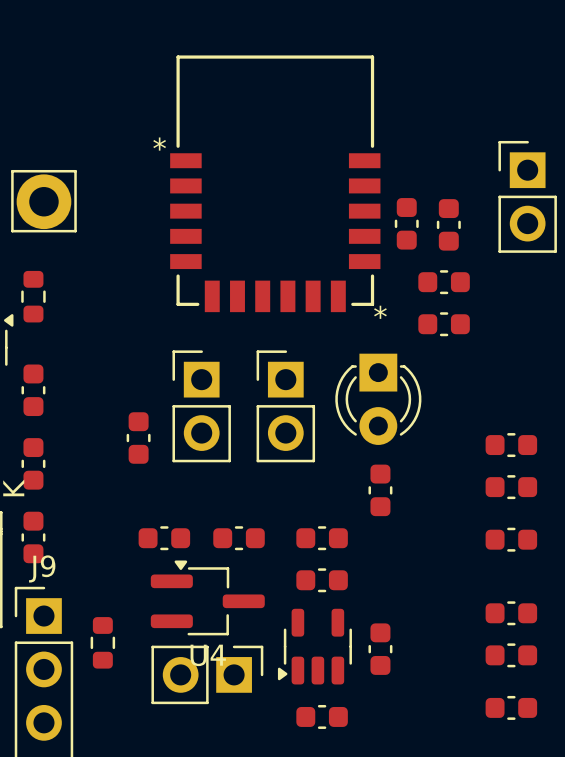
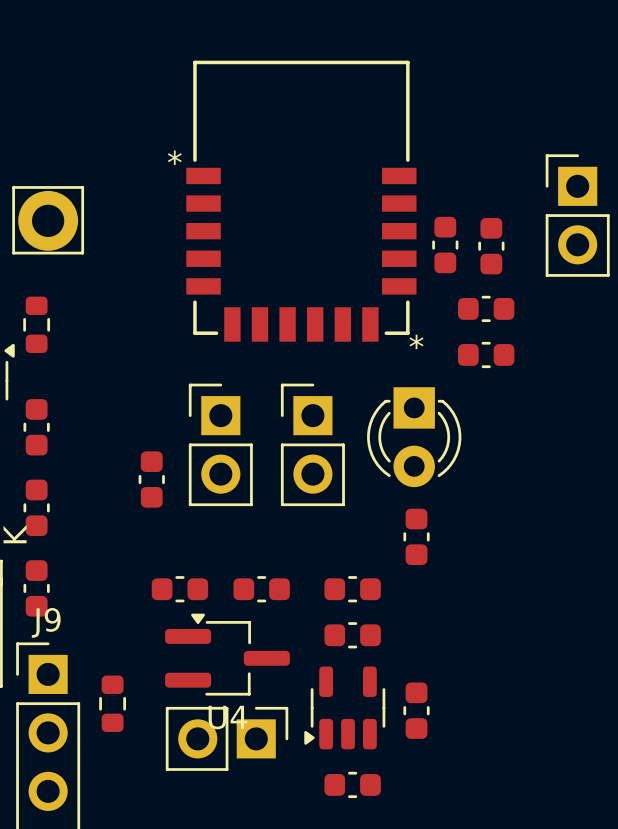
part: (511, 445) -> none
part: (511, 487) -> none
part: (511, 539) -> none
part: (511, 613) -> none
part: (511, 655) -> none
part: (511, 707) -> none

